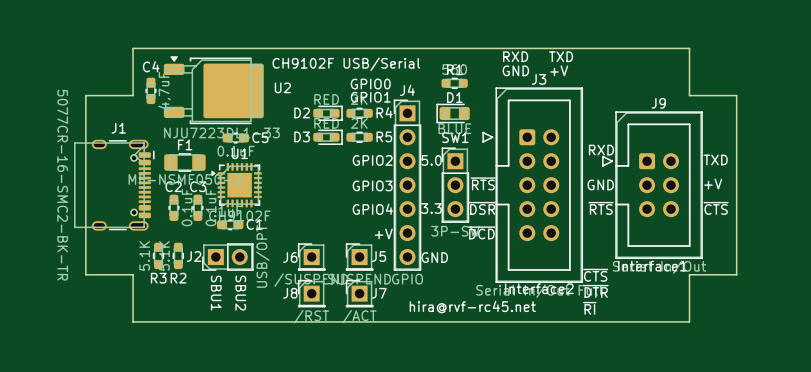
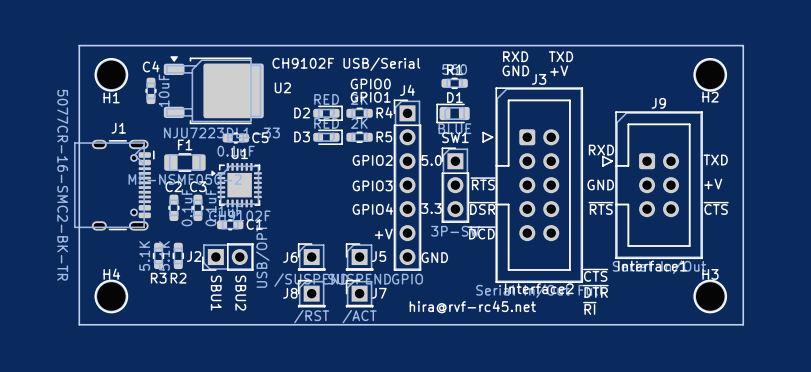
board edge: (133, 48) (689, 48) (689, 95) (736, 95) (736, 274) (689, 274) (689, 321) (133, 321) (133, 274) (85, 274) (85, 95) (133, 95) (133, 48) -> (79, 45) (79, 324) (743, 324) (743, 45) (79, 45)
H1: none -> (111, 74)
H2: none -> (710, 74)
C4 value: 4,7uF (164, 90) -> 10uF (164, 90)
H4: none -> (111, 296)
H3: none -> (710, 296)

